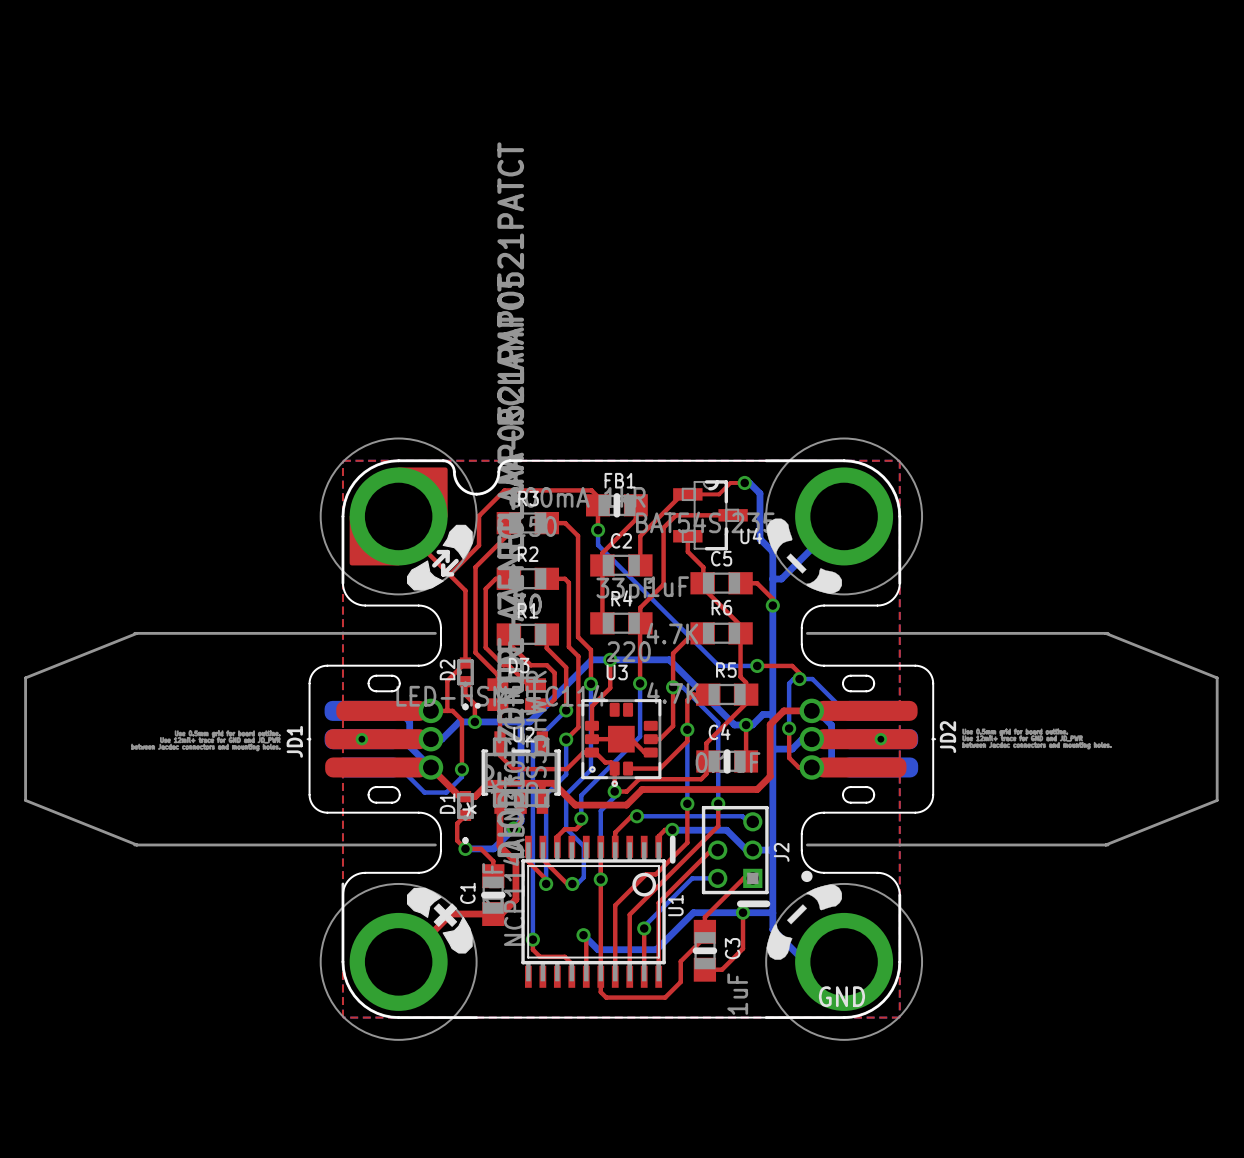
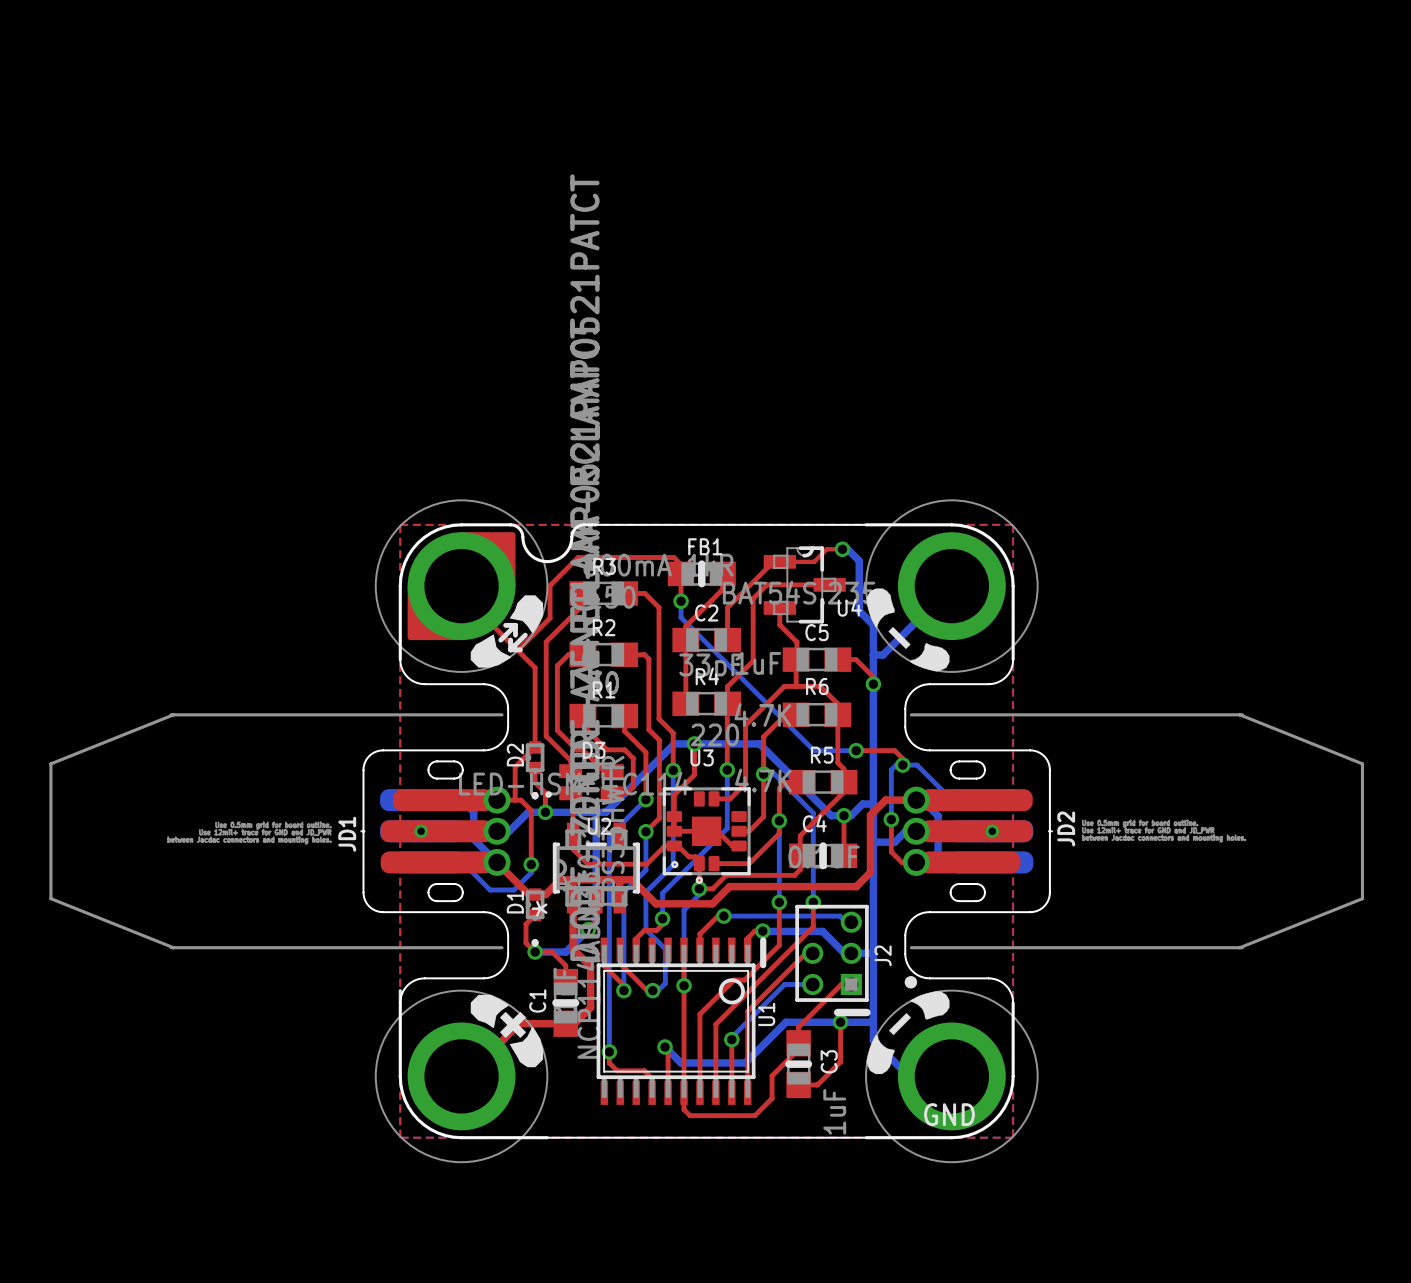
top track: (702, 587) (740, 625) -> (796, 664) (796, 686)
top track: none -> (837, 706) (820, 686) (784, 686) (745, 725) (745, 783) (730, 798) (714, 798)

